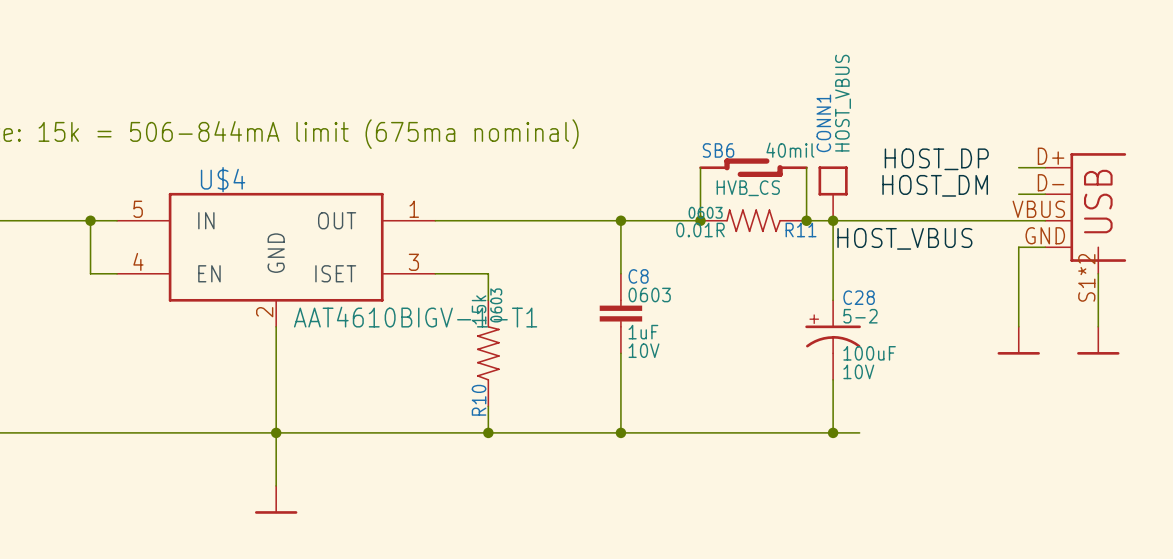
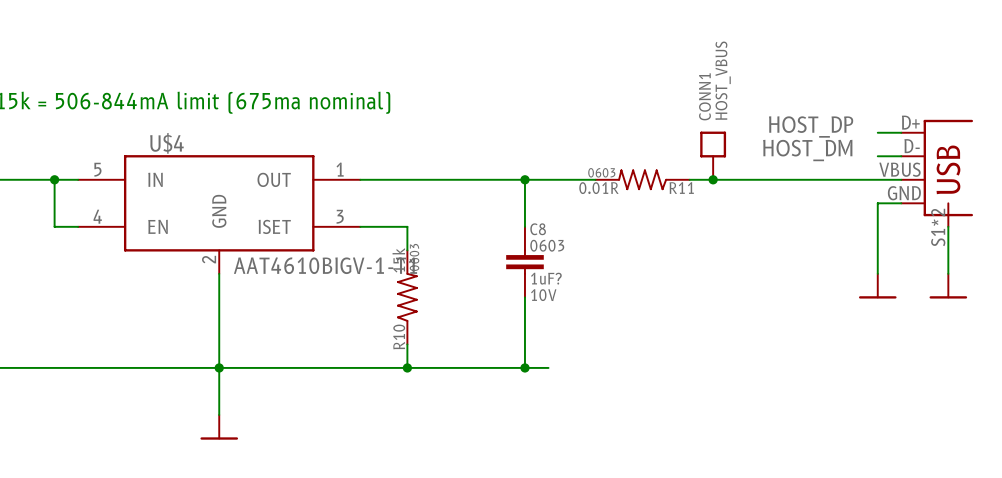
wire: (700, 167) (700, 220) -> none
SB6: HVB_CS (753, 167) -> none
wire: (806, 167) (806, 220) -> none
junction: (700, 220) -> none
junction: (806, 220) -> none
wire: (833, 220) (833, 300) -> none
label: HOST_VBUS (904, 238) -> none
C8 value: 1uF (643, 332) -> 1uF? (546, 278)
C28: 100uF (833, 340) -> none
wire: (833, 379) (833, 432) -> none
wire: (647, 432) (859, 432) -> none
junction: (833, 432) -> none

